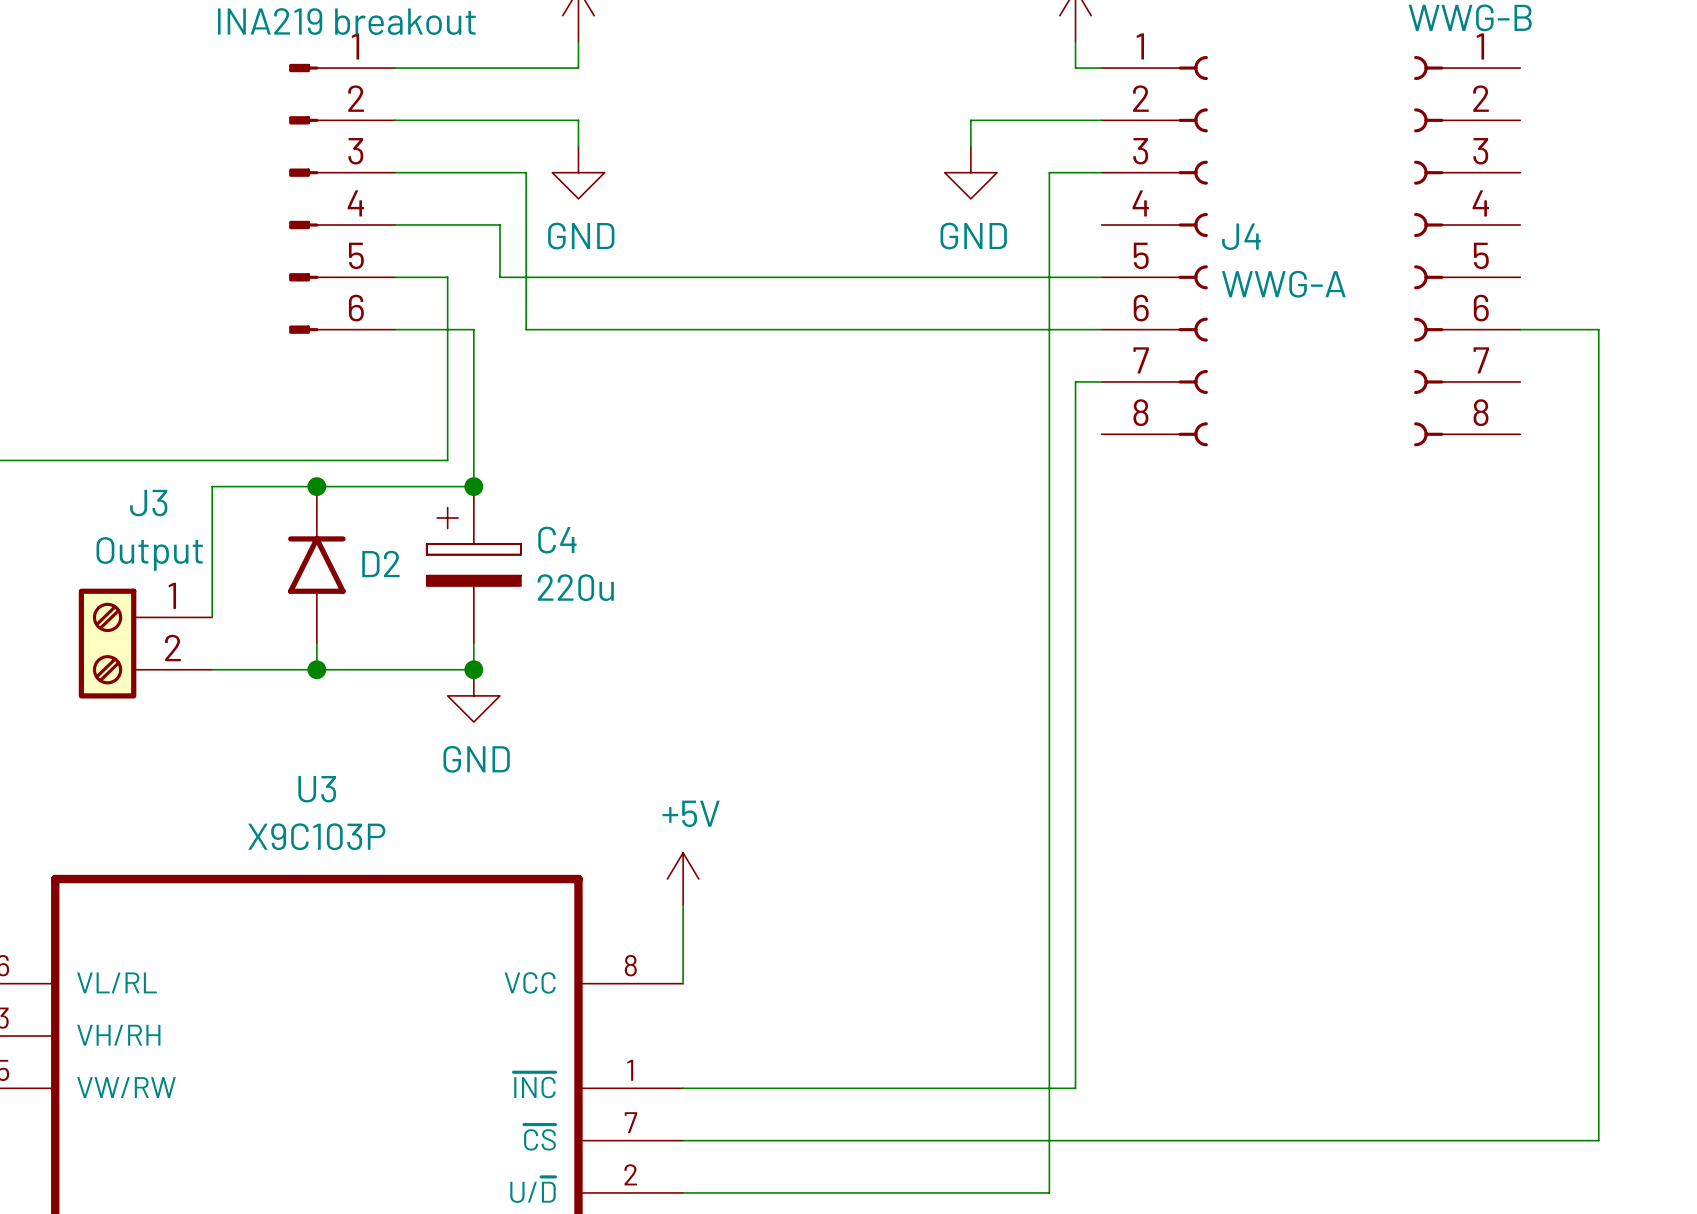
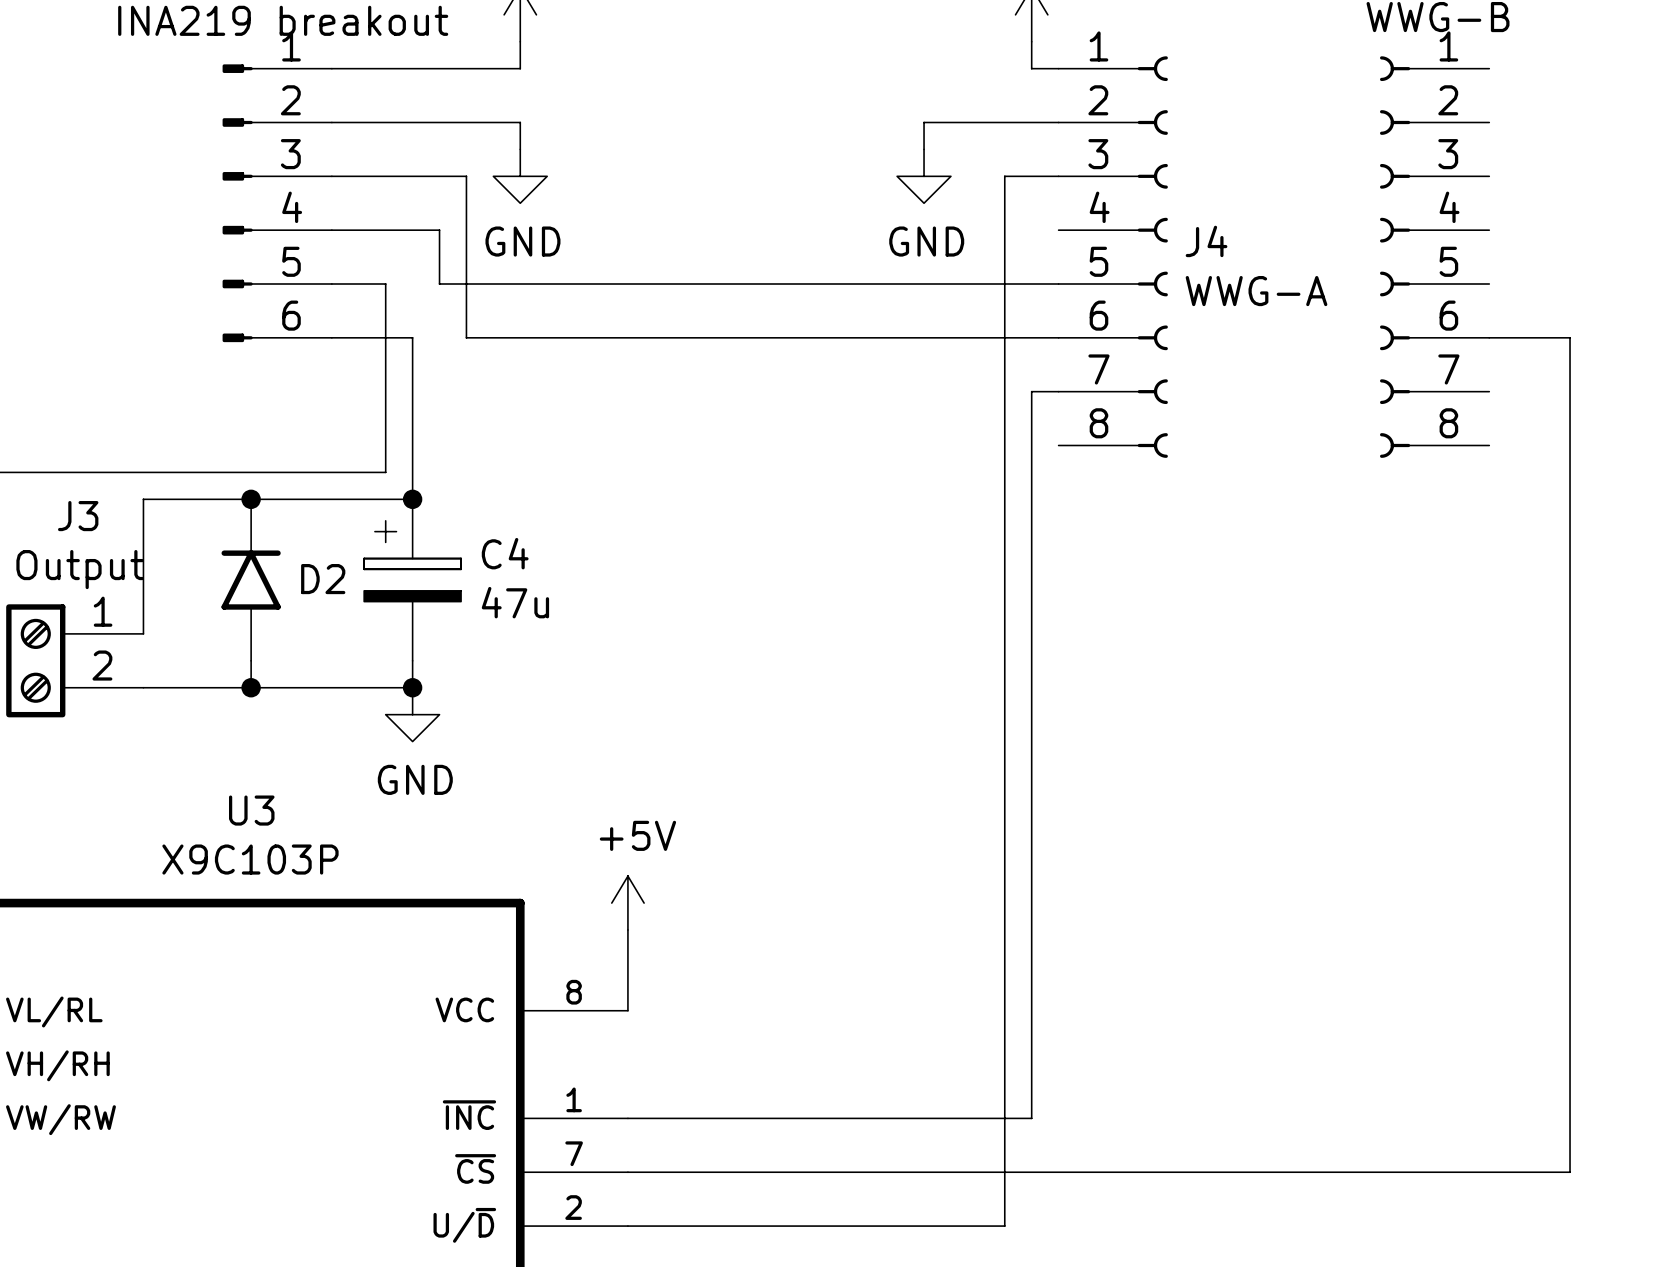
C4 value: 220u (575, 587) -> 47u (515, 602)

